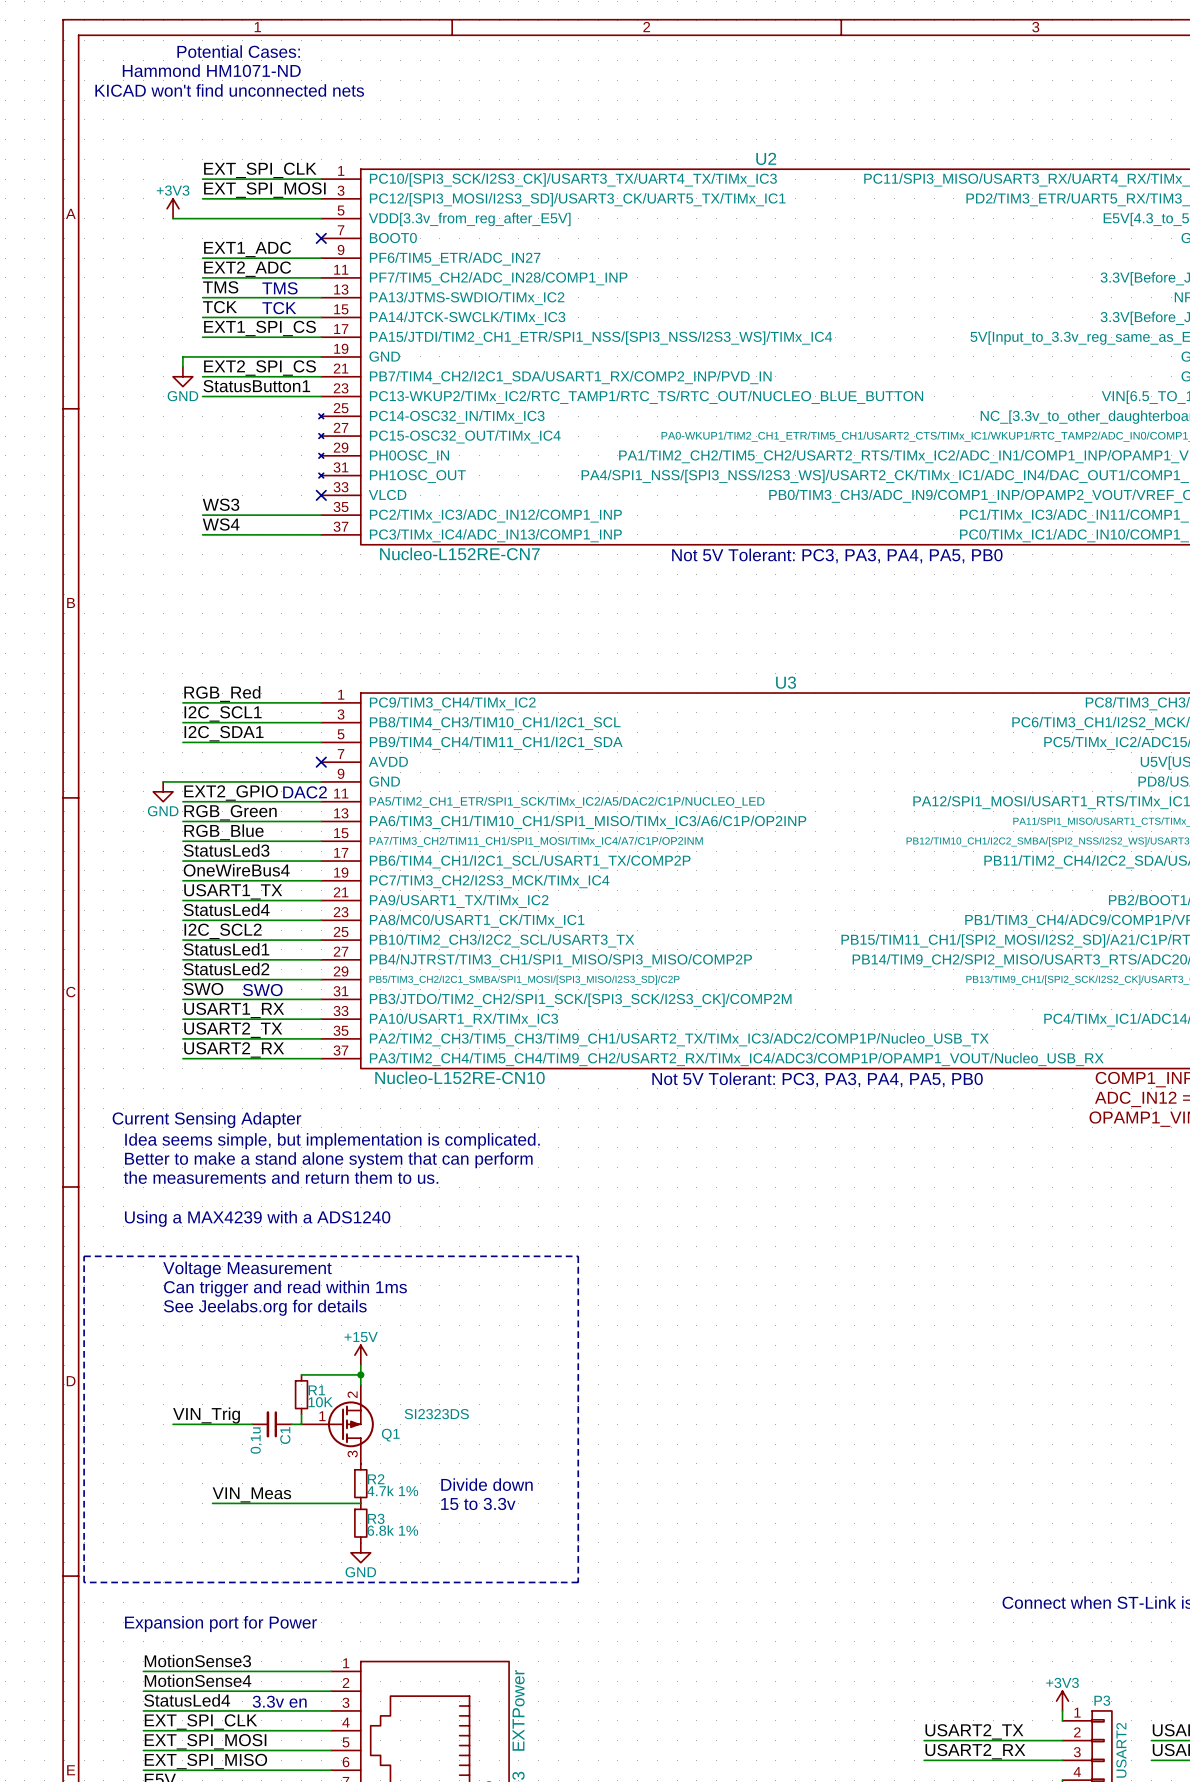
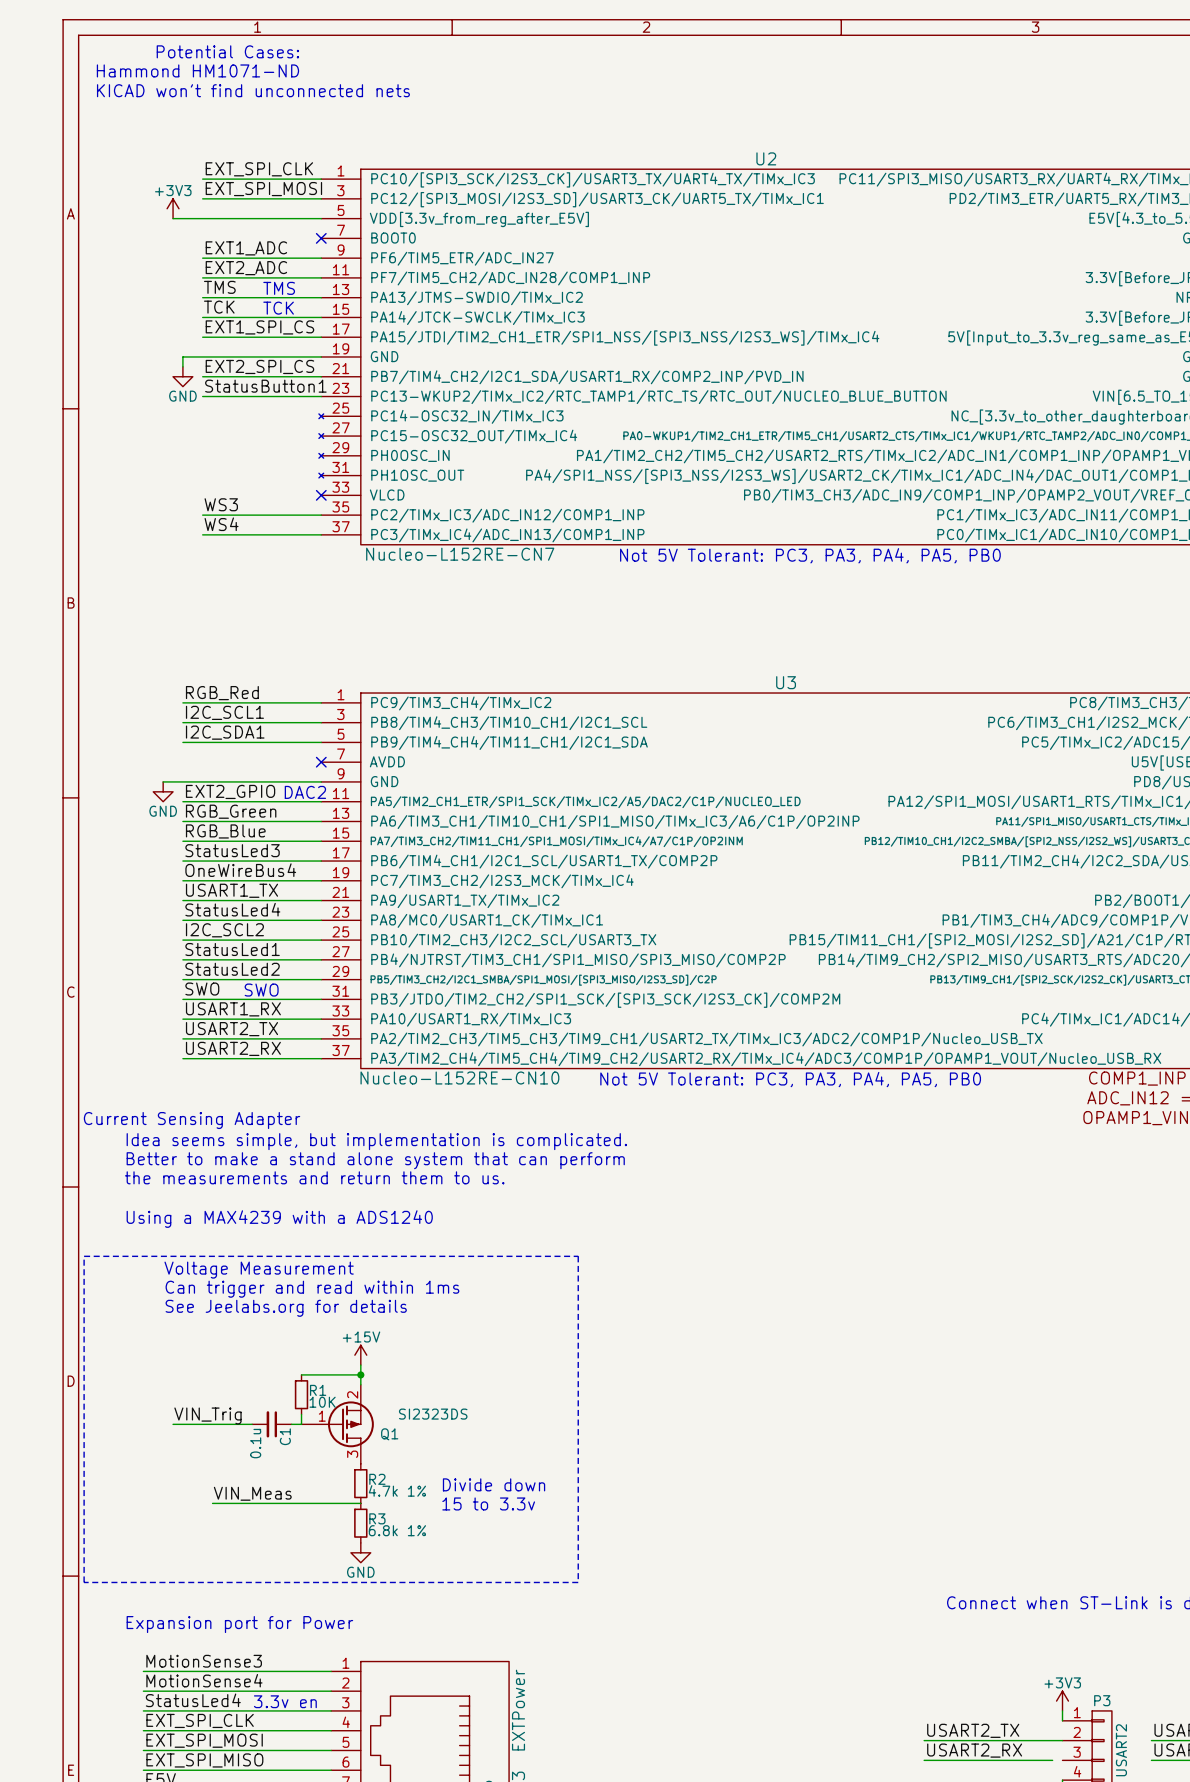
wire: (1052, 1760) (1062, 1760) -> none

